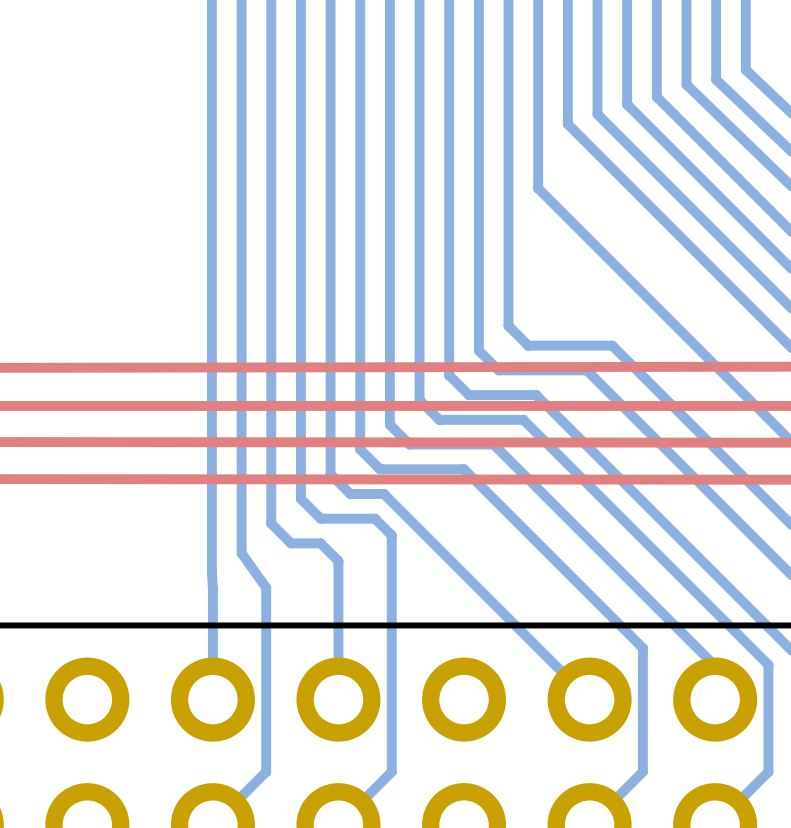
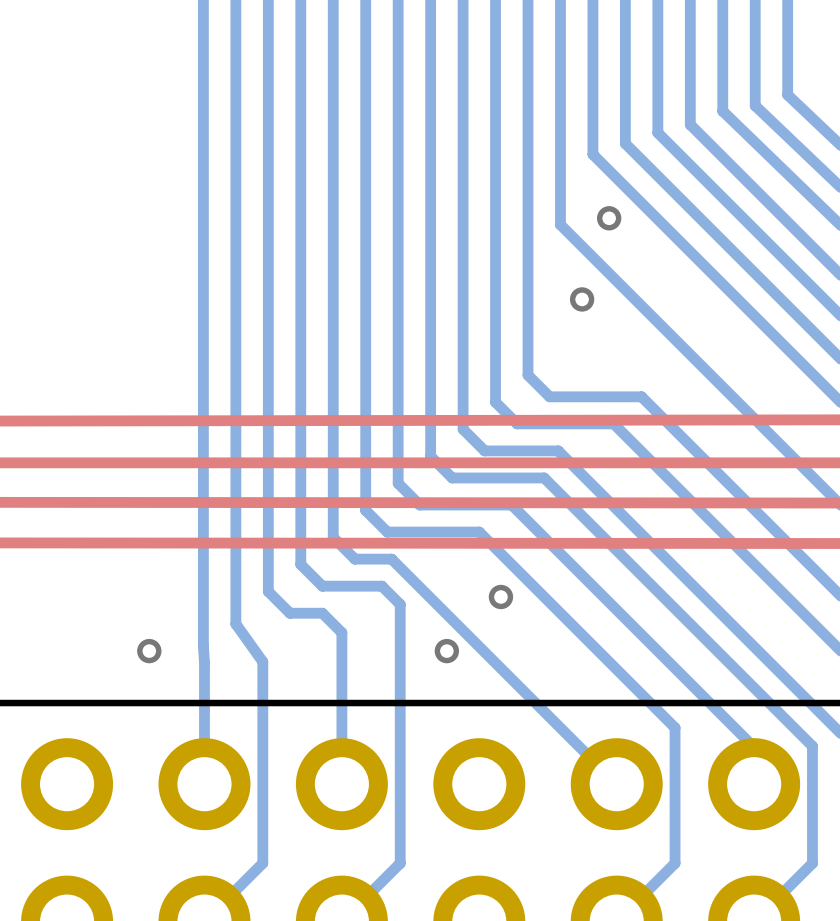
via: none -> (609, 218)
via: none -> (582, 299)
via: none -> (500, 596)
via: none -> (149, 651)
via: none -> (446, 651)

